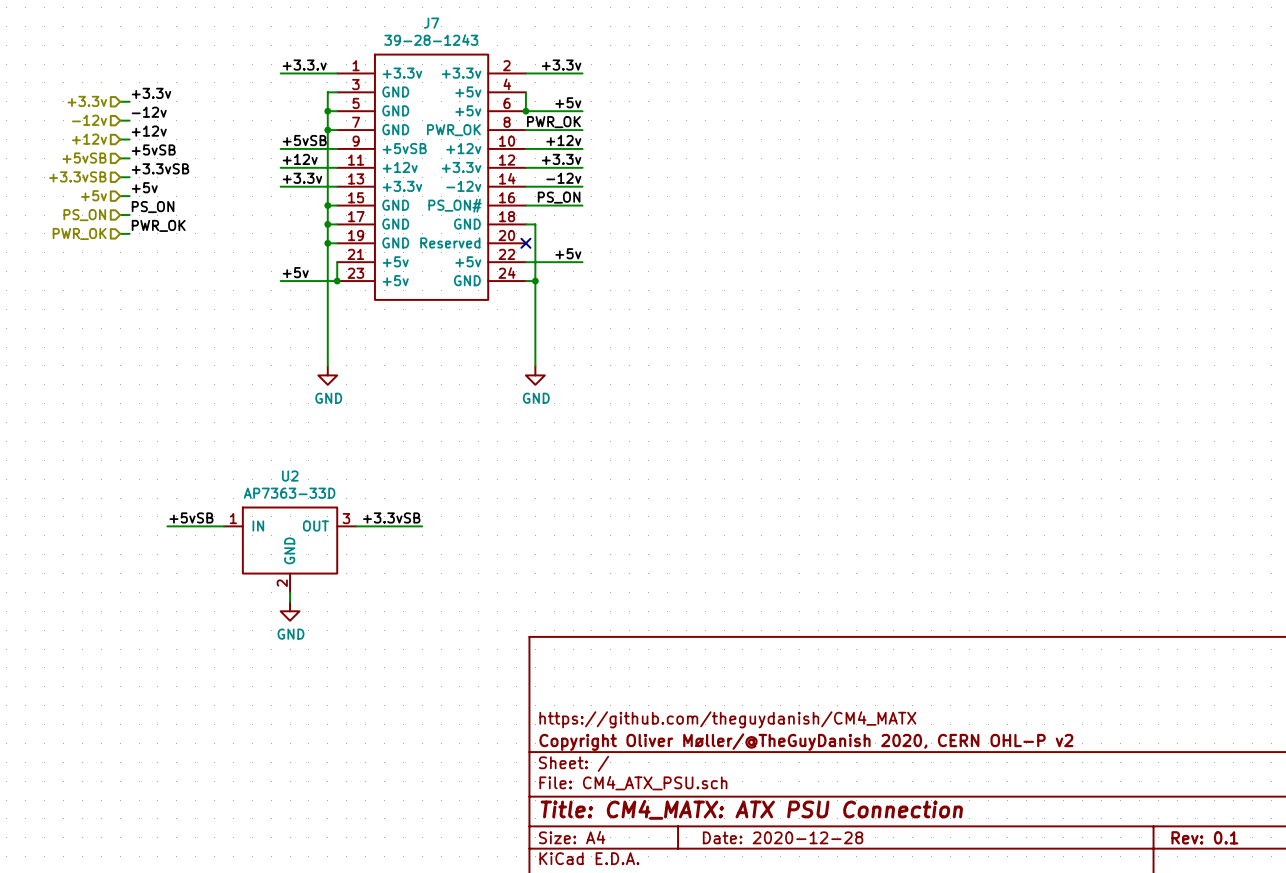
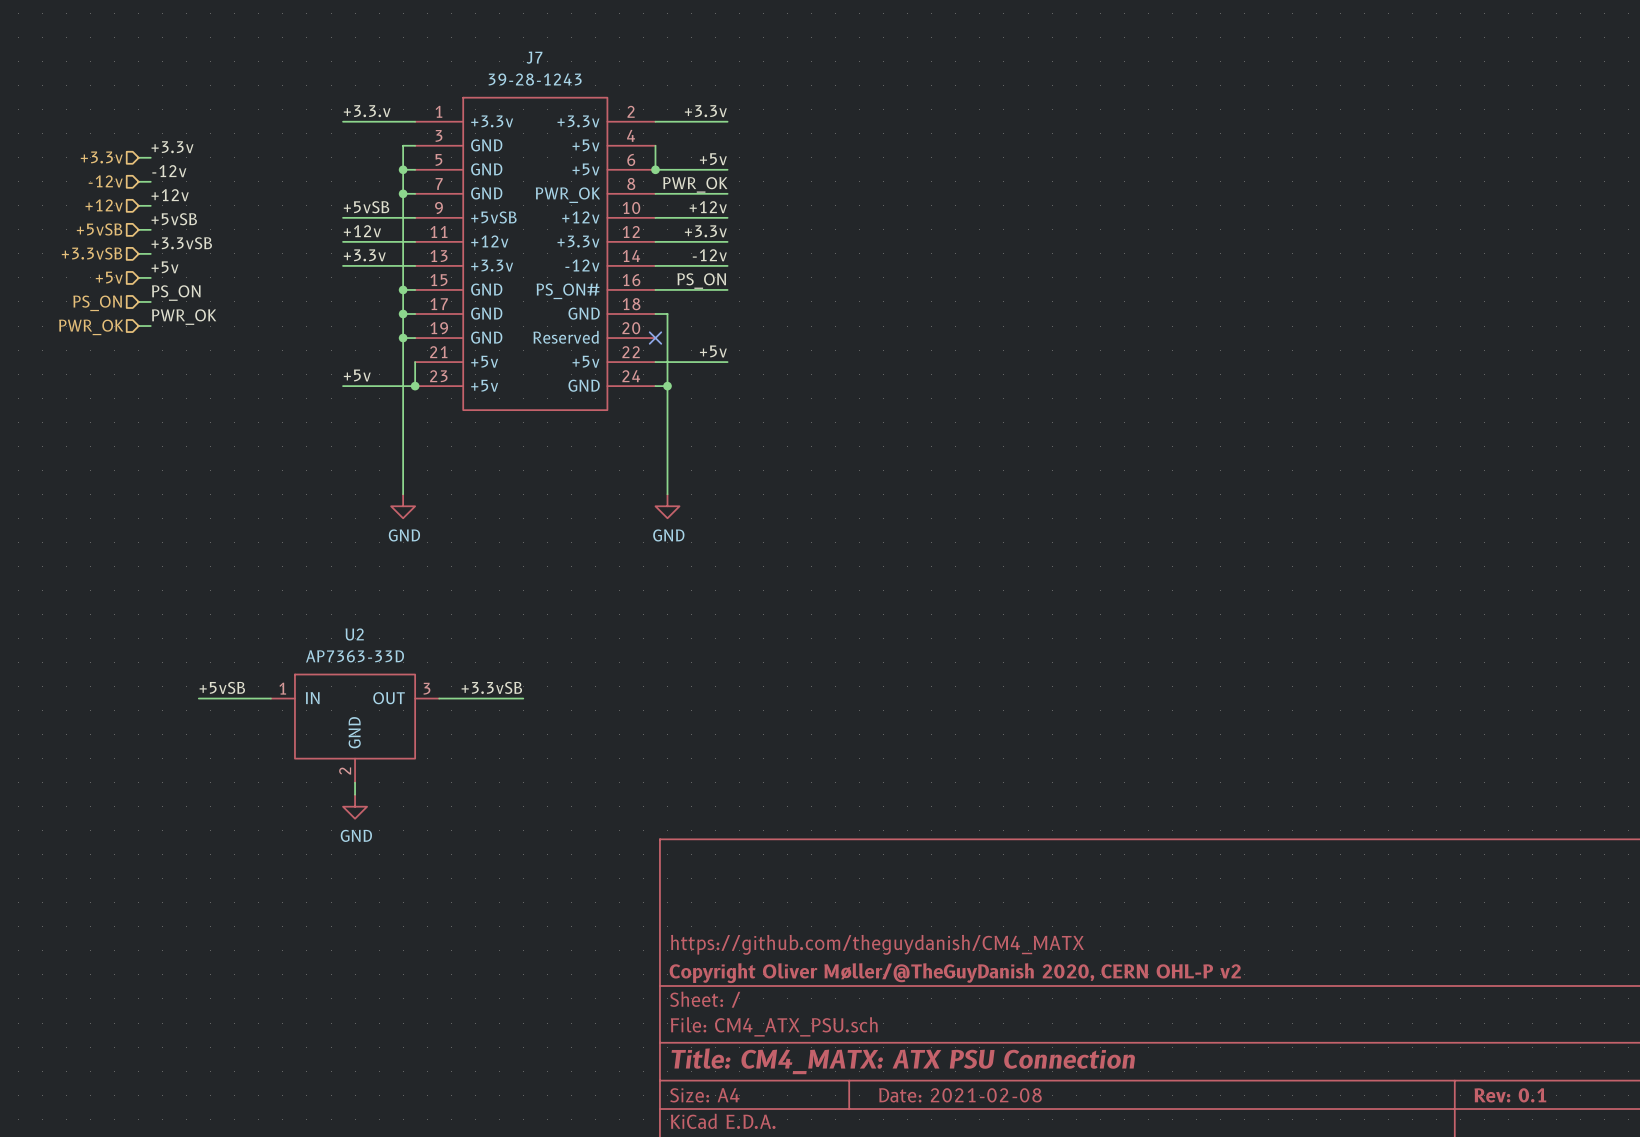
title block: Date: 2020-12-28 (783, 837) -> Date: 2021-02-08 (960, 1095)

